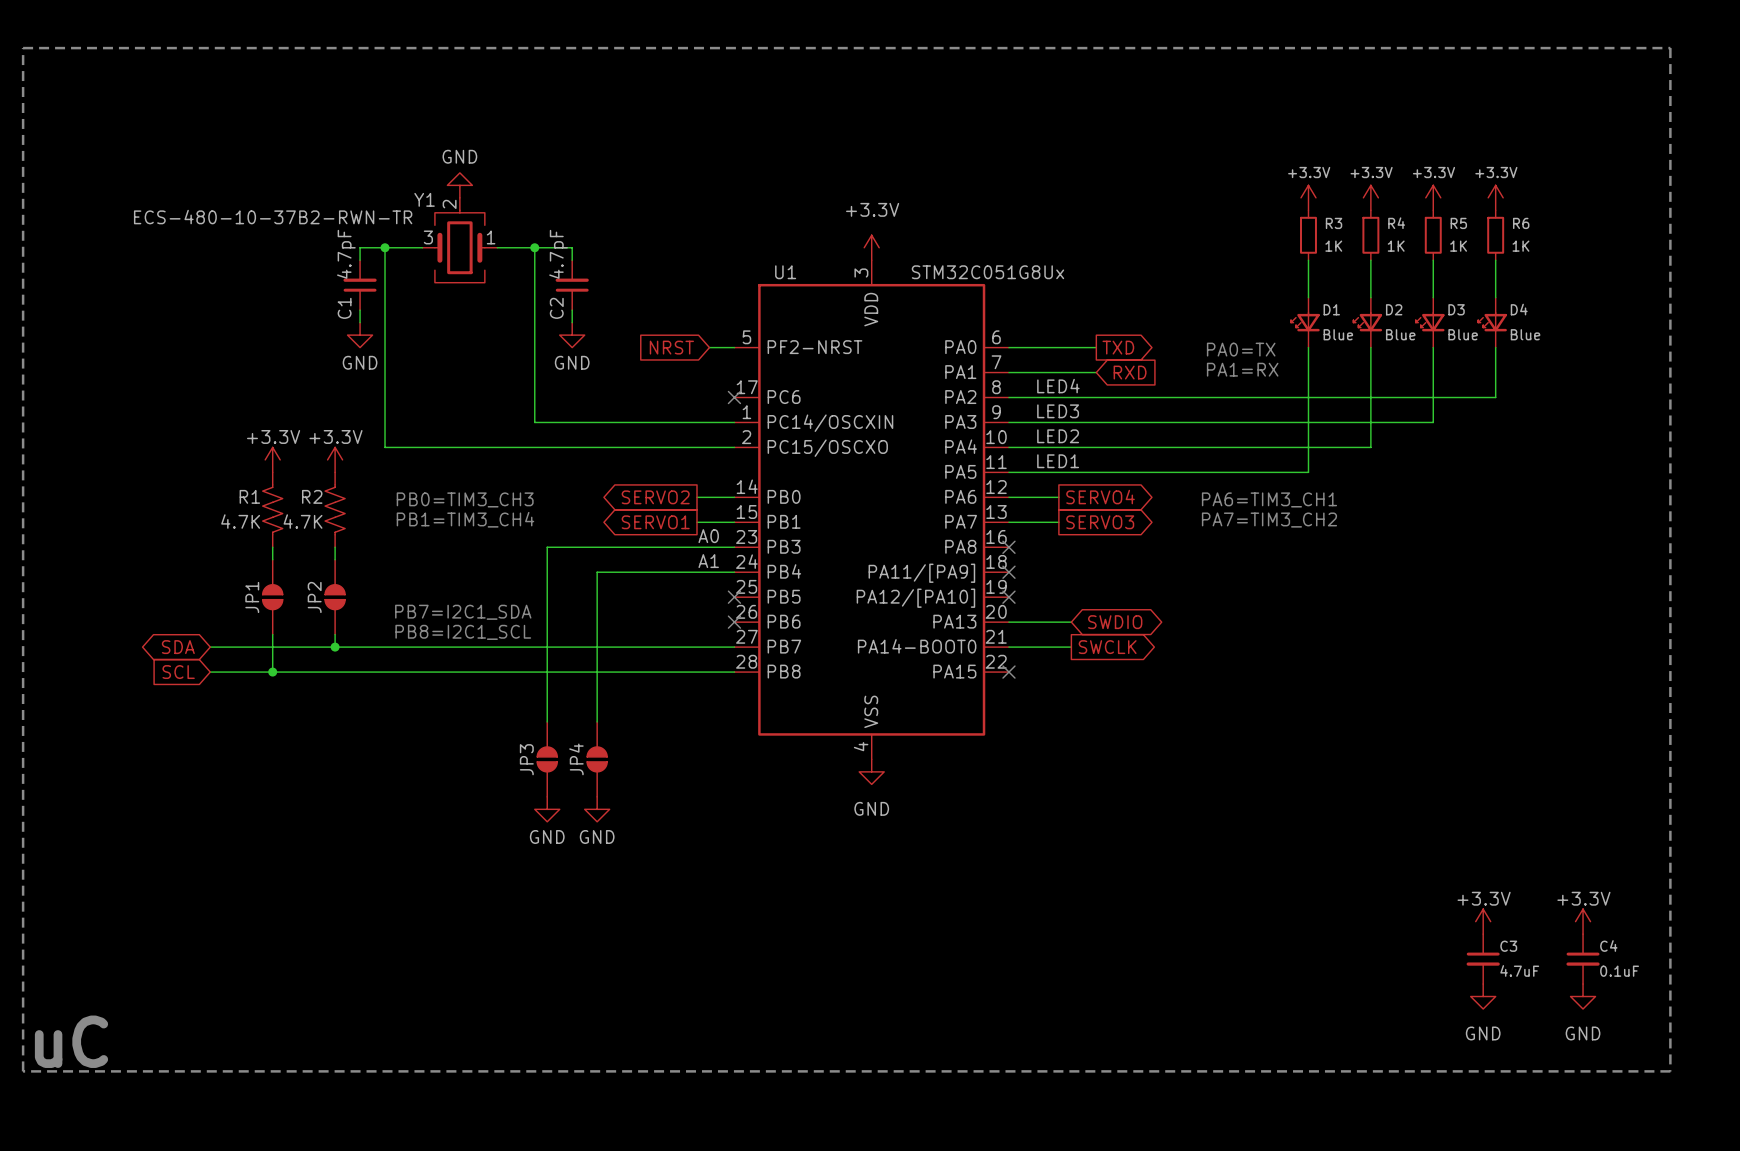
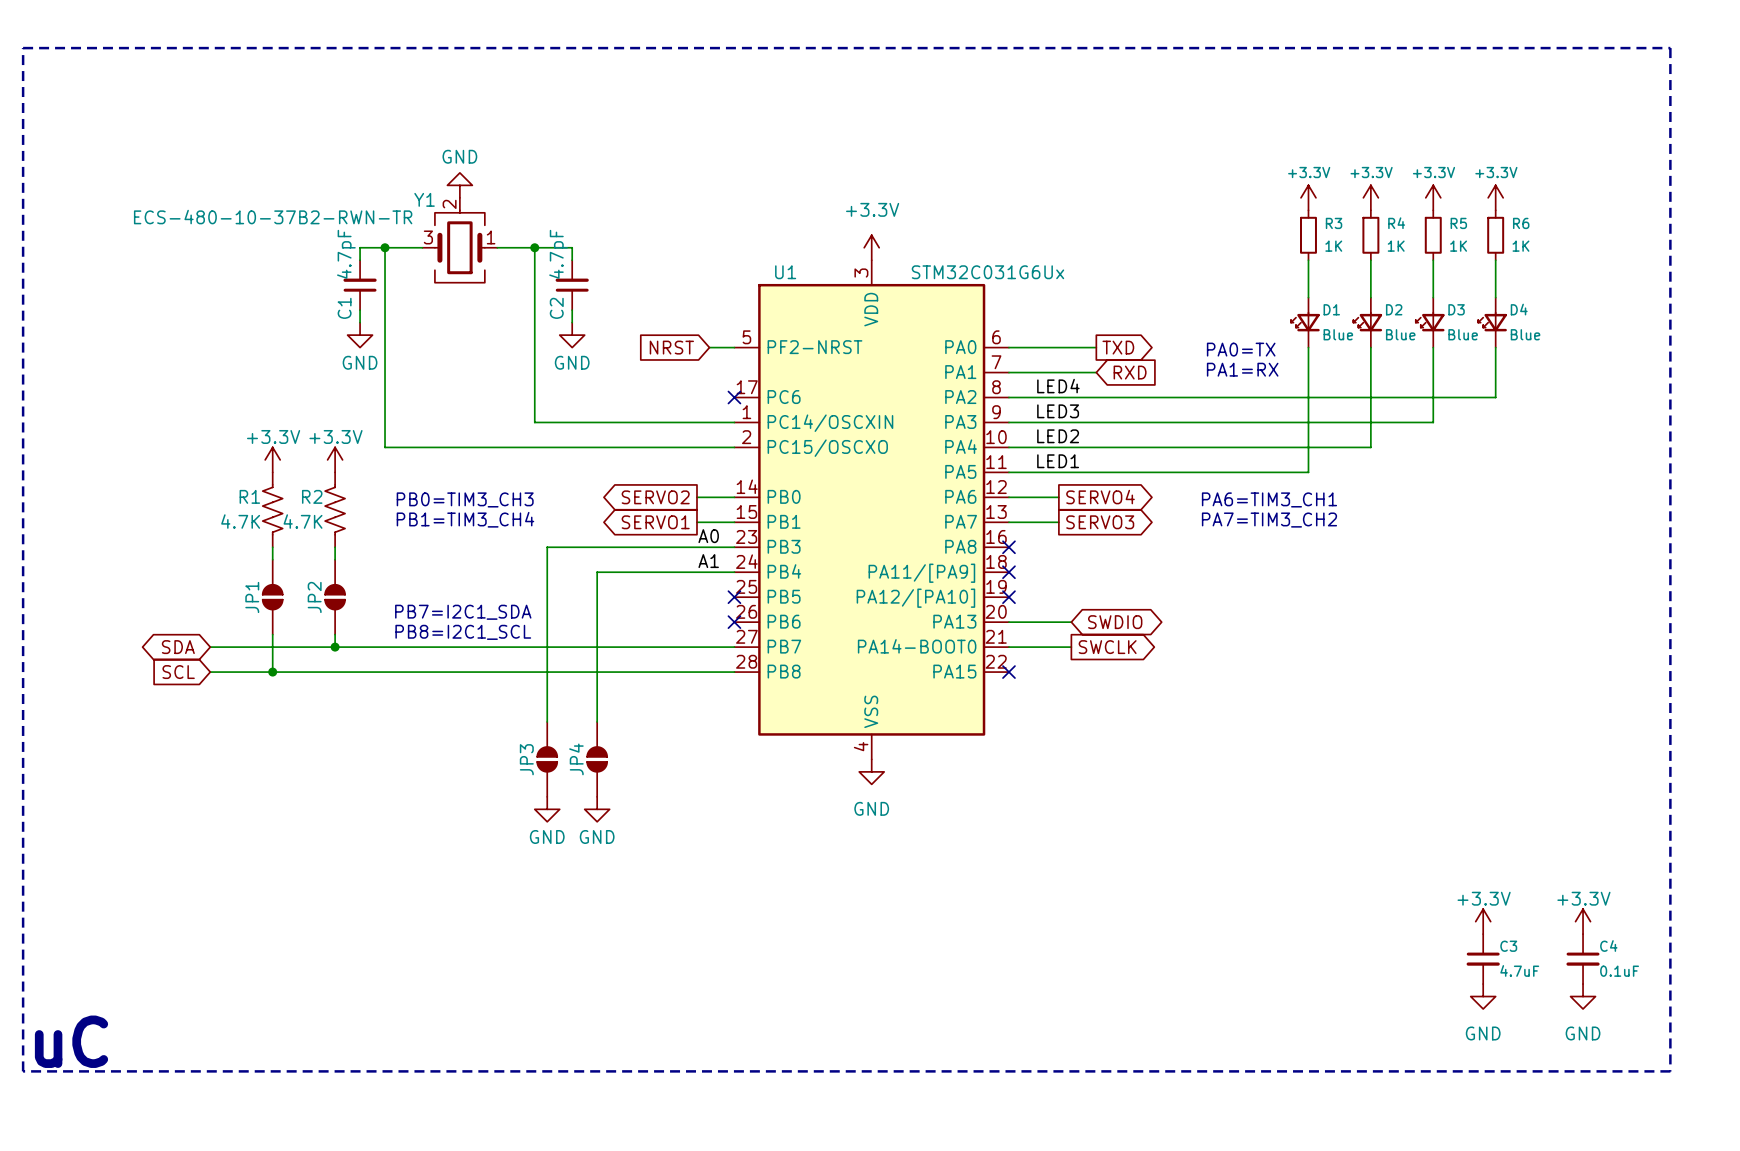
U1 value: STM32C051G8Ux (987, 272) -> STM32C031G6Ux (987, 272)

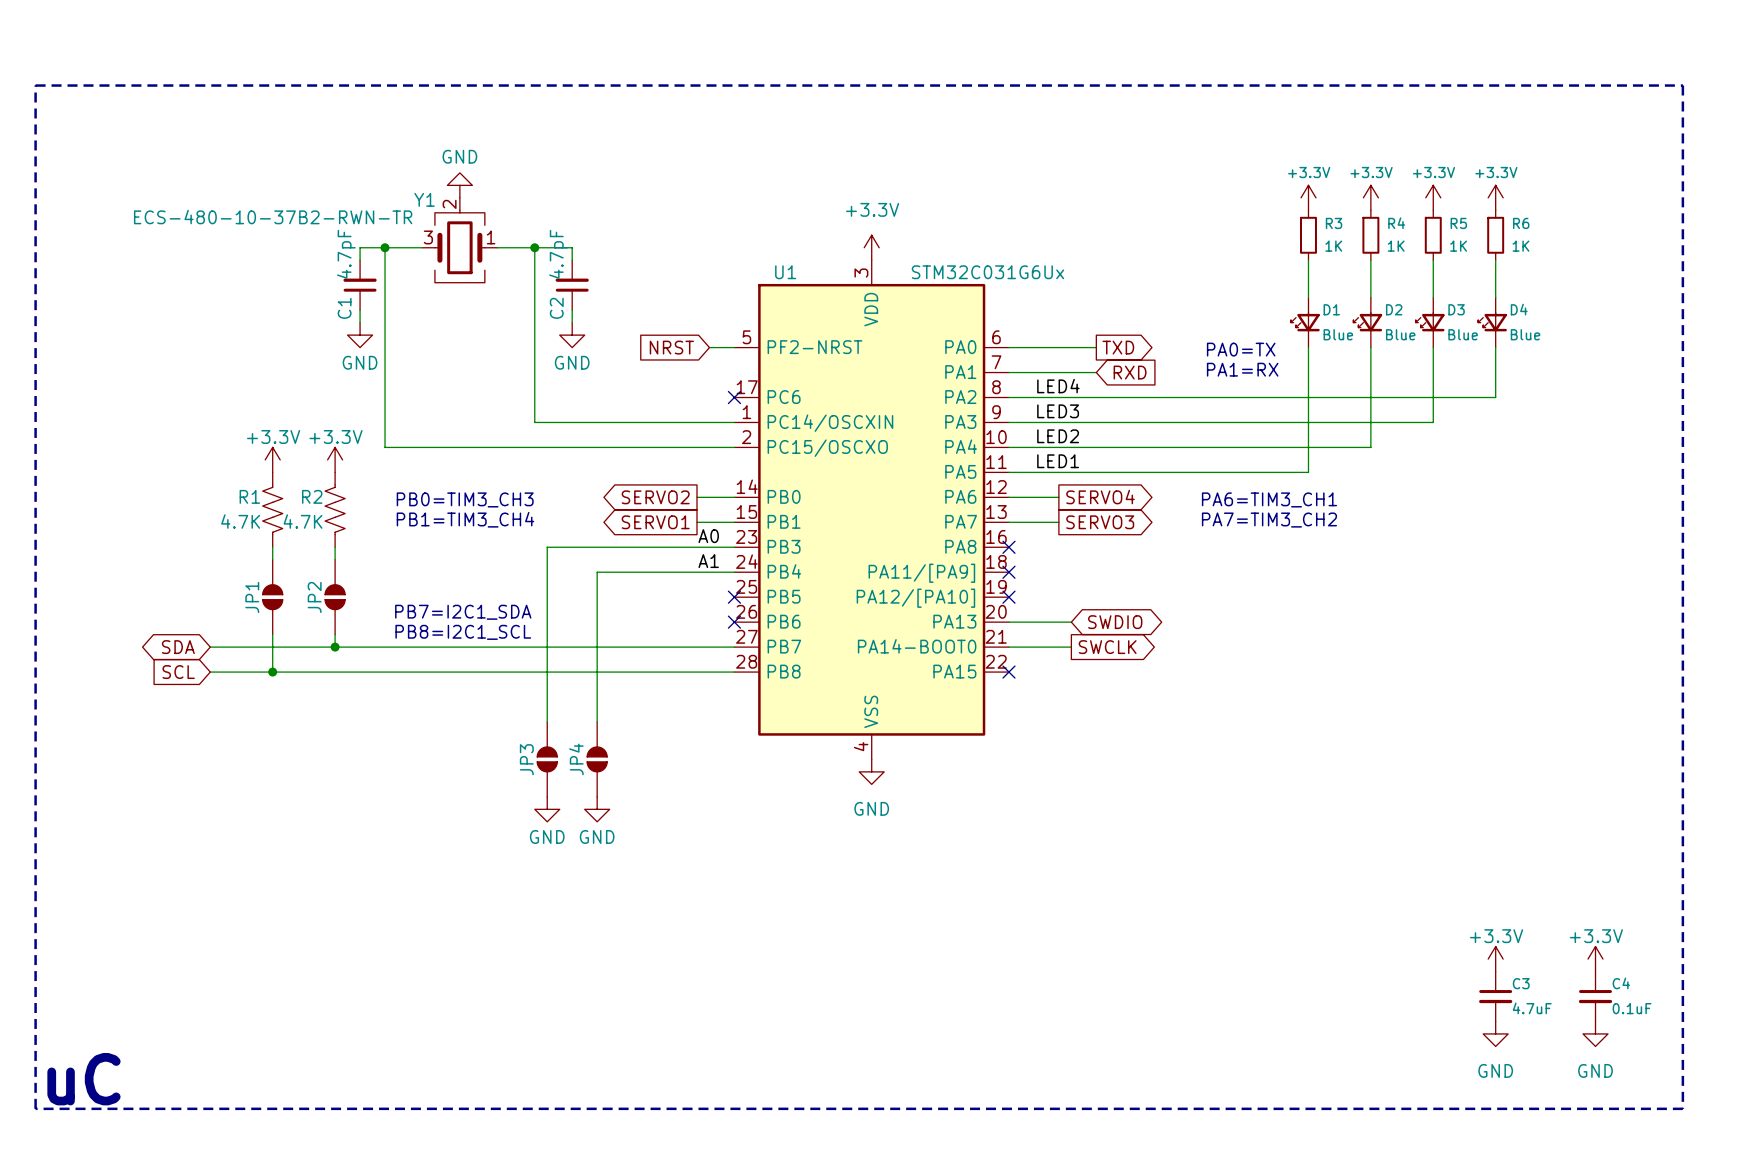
line: (23, 48) (1670, 48) (1670, 1071) (23, 1071) (23, 48) -> (35, 85) (35, 1108) (1682, 1108) (1682, 85) (35, 85)
power symbol position: +3.3V (1483, 921) -> +3.3V (1495, 959)
power symbol position: +3.3V (1583, 921) -> +3.3V (1595, 959)
C3 position: (1483, 959) -> (1495, 996)
C4 position: (1583, 959) -> (1595, 996)
power symbol position: GND (1483, 996) -> GND (1495, 1033)
power symbol position: GND (1583, 996) -> GND (1595, 1033)
text position: uC (71, 1041) -> uC (83, 1079)

